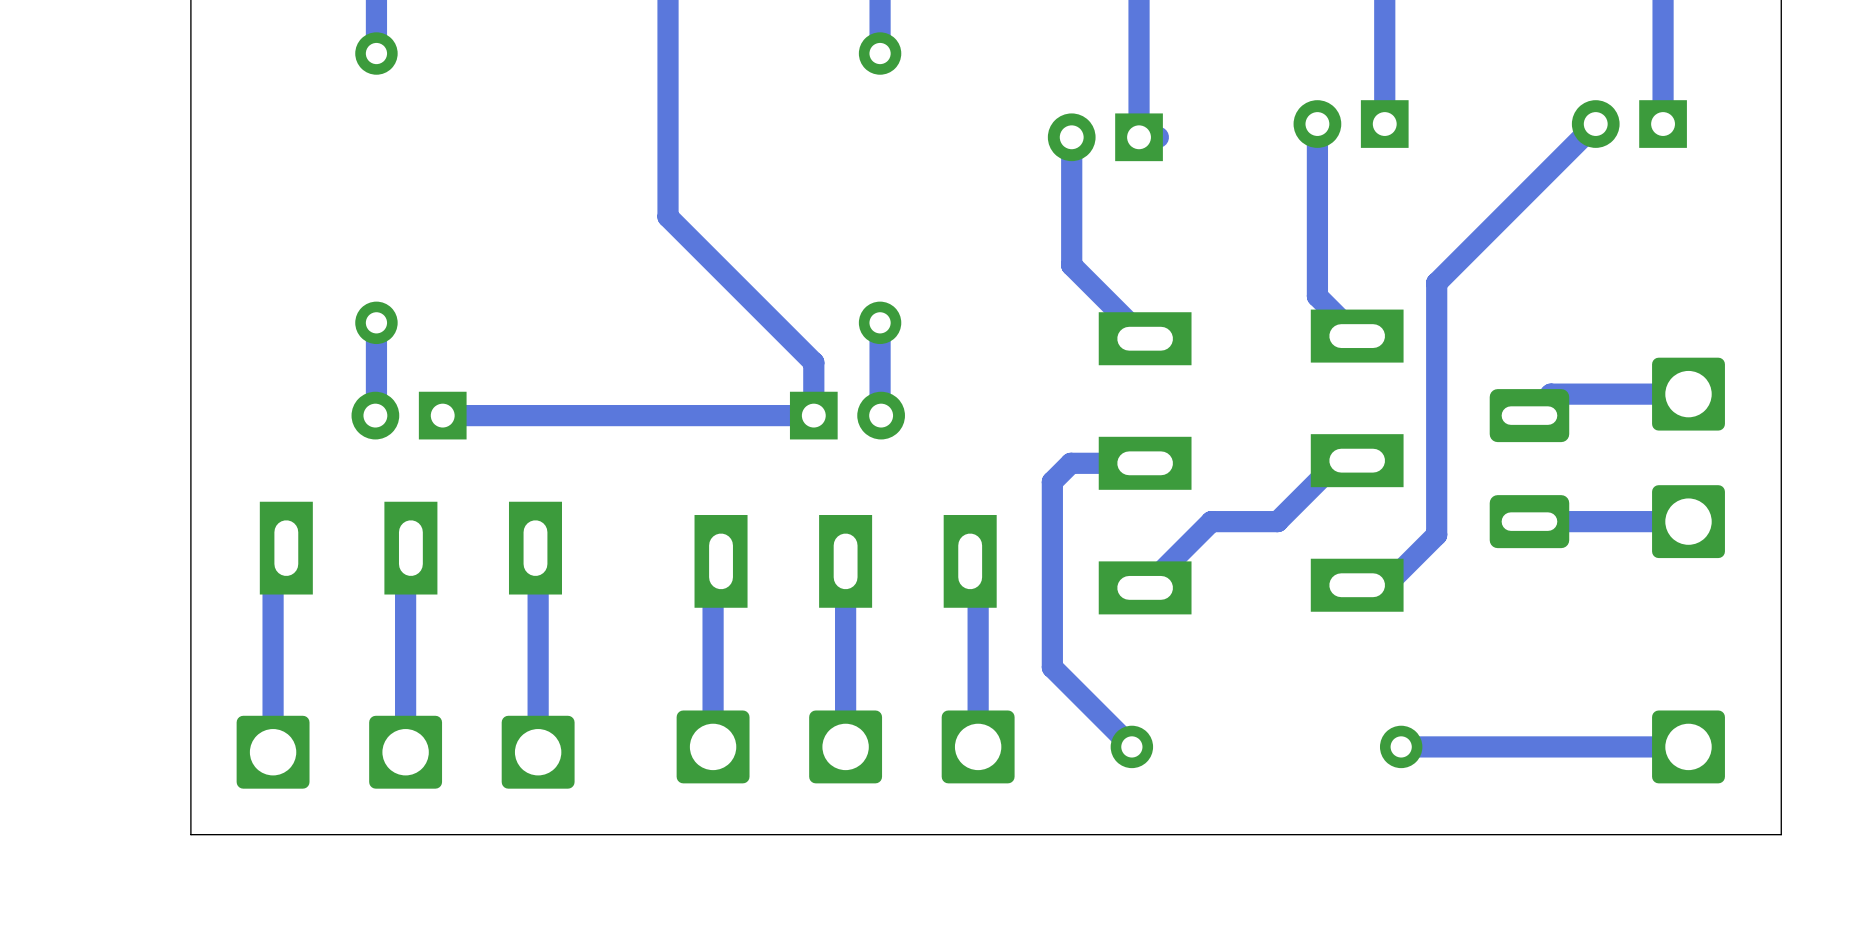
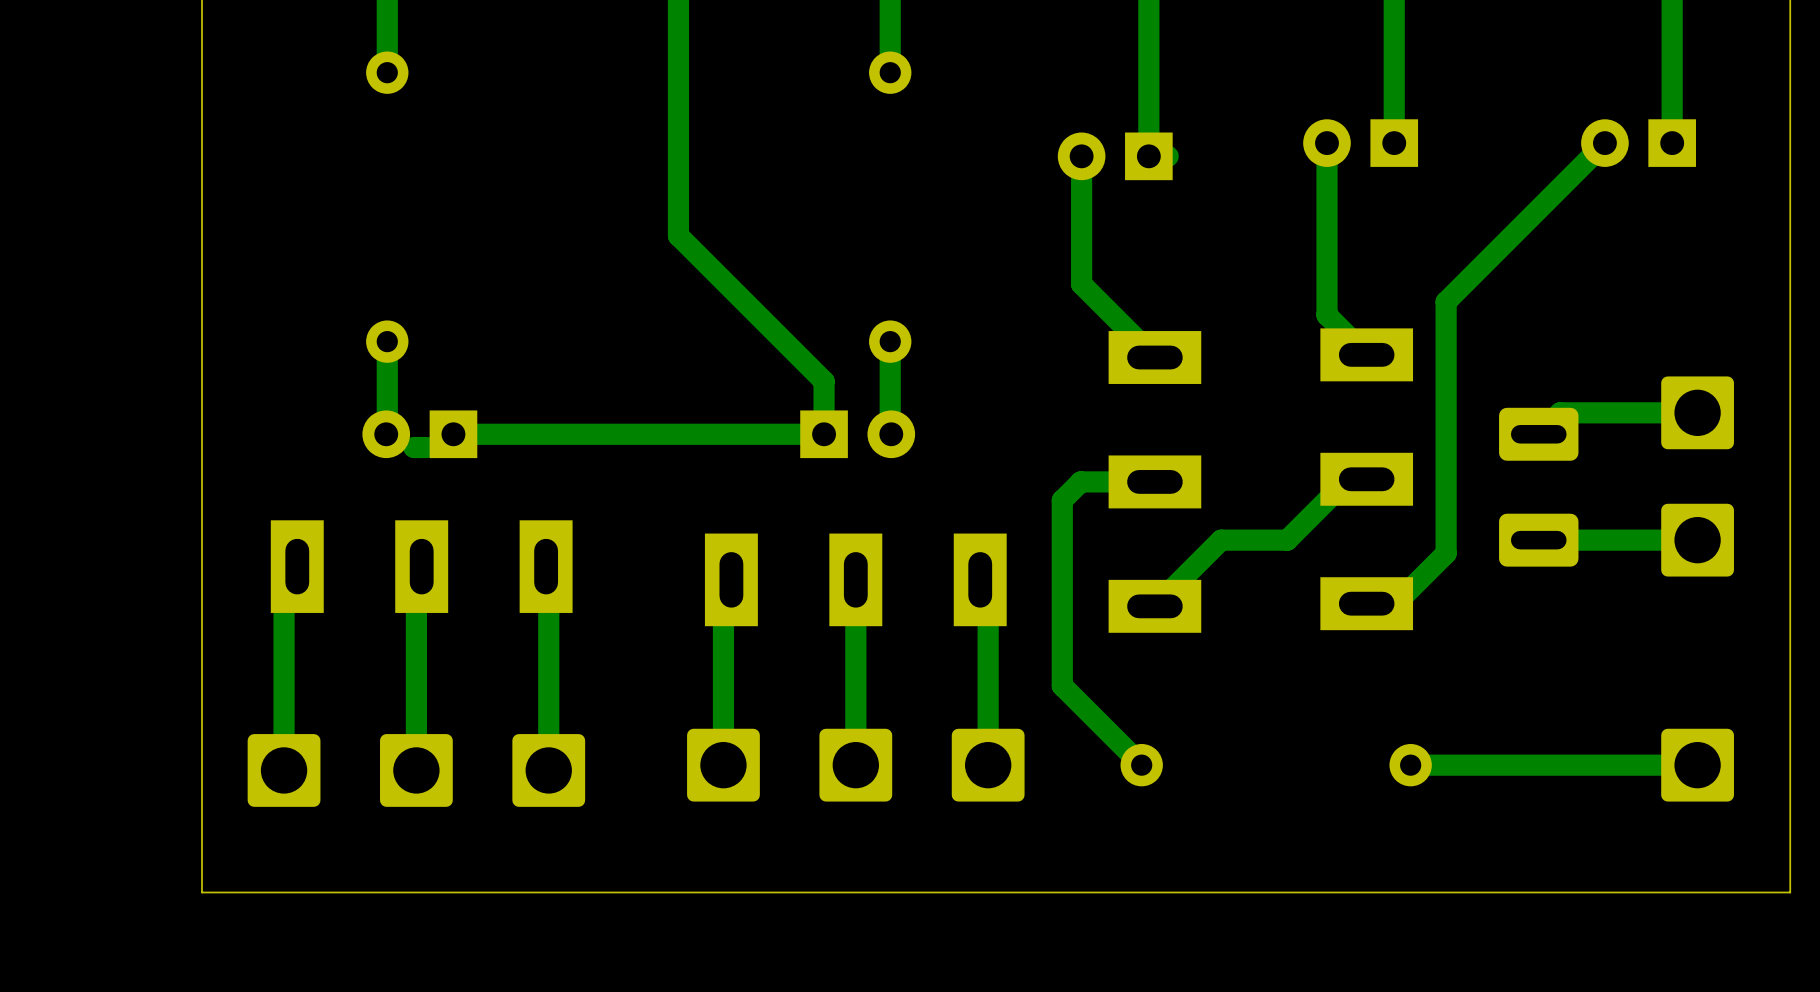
track: none -> (426, 447) (413, 447)
board edge: (1781, 834) (190, 834) -> (1790, 852) (1790, 892) (201, 892) (201, 852)

